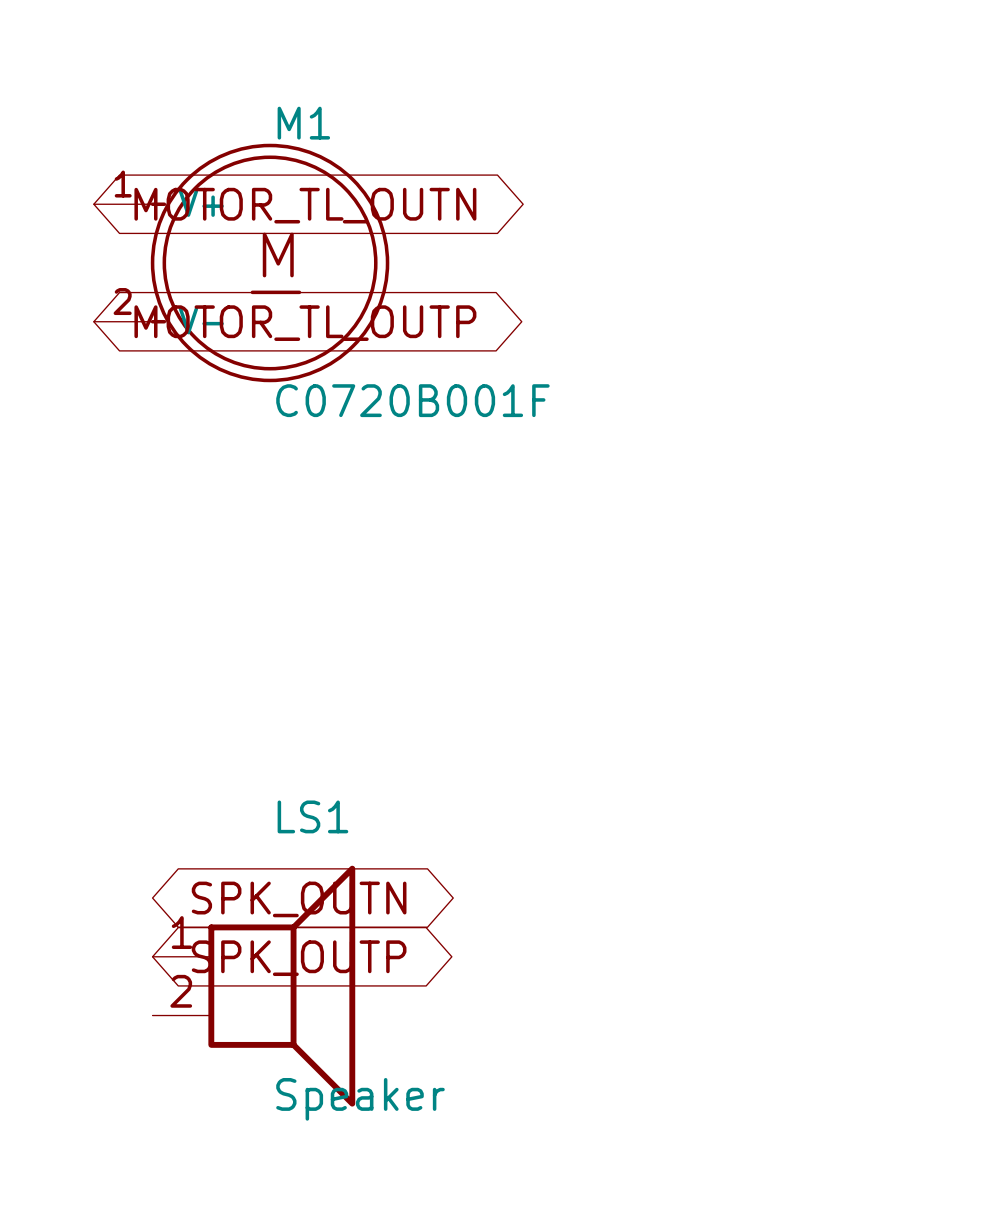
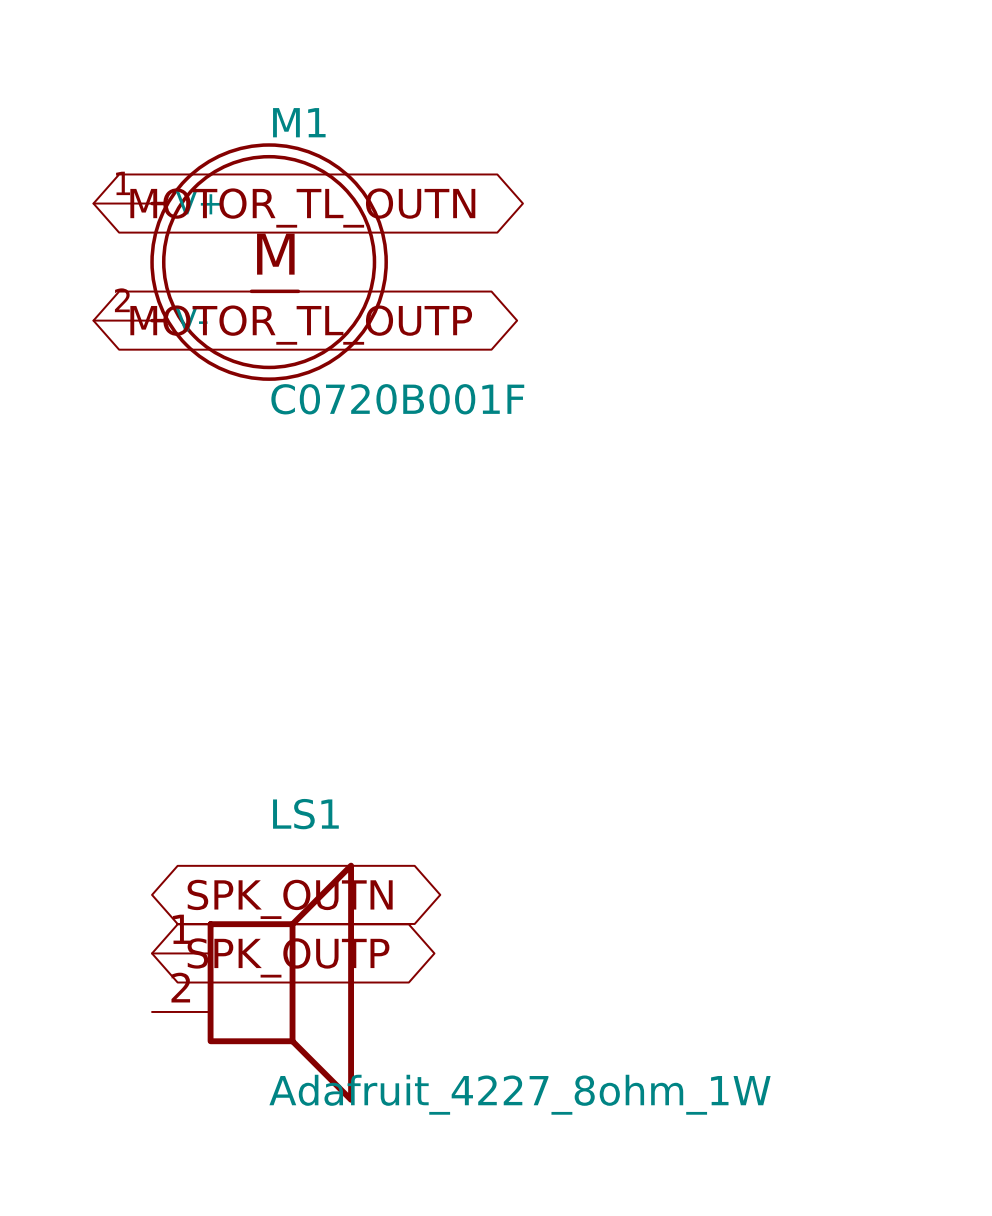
LS1 value: Speaker (360, 1099) -> Adafruit_4227_8ohm_1W (520, 1094)

